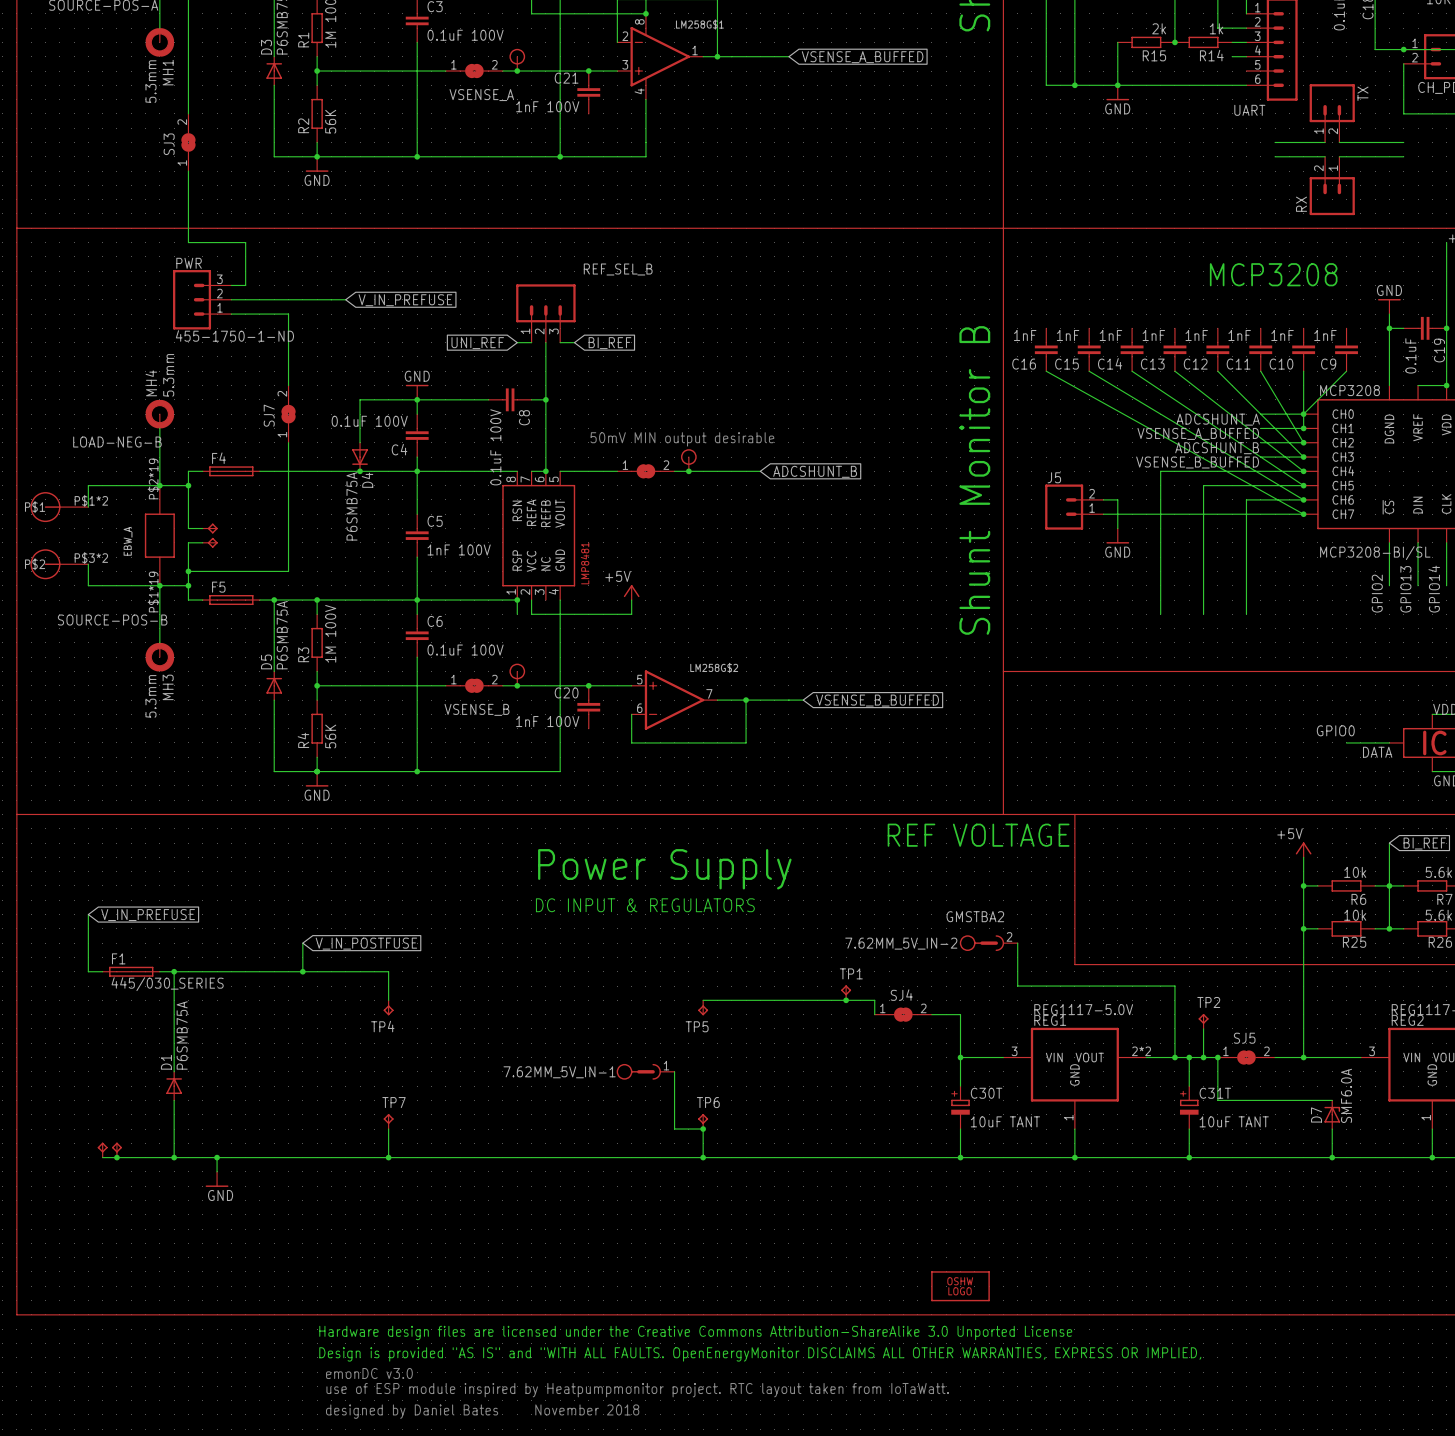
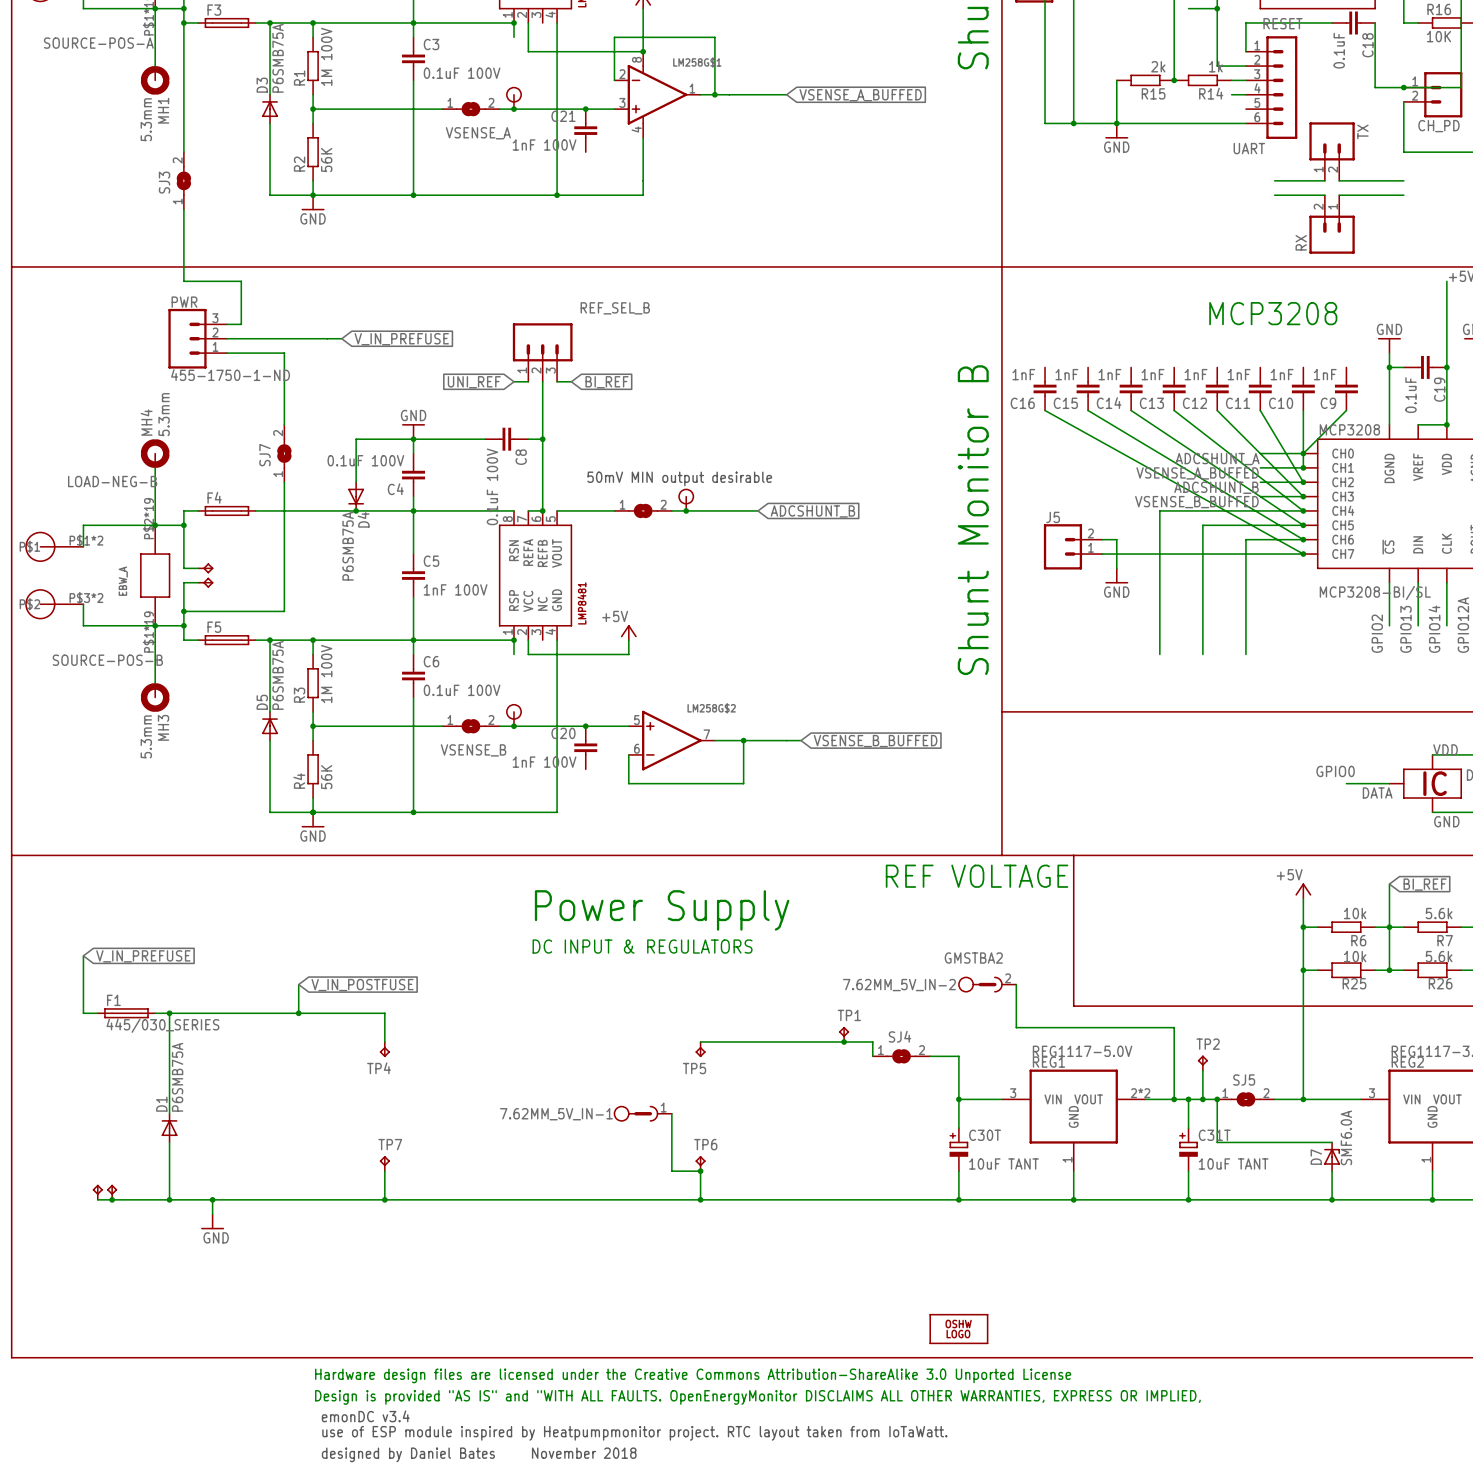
text: emonDC v3.0 (369, 1373) -> emonDC v3.4 (365, 1416)

